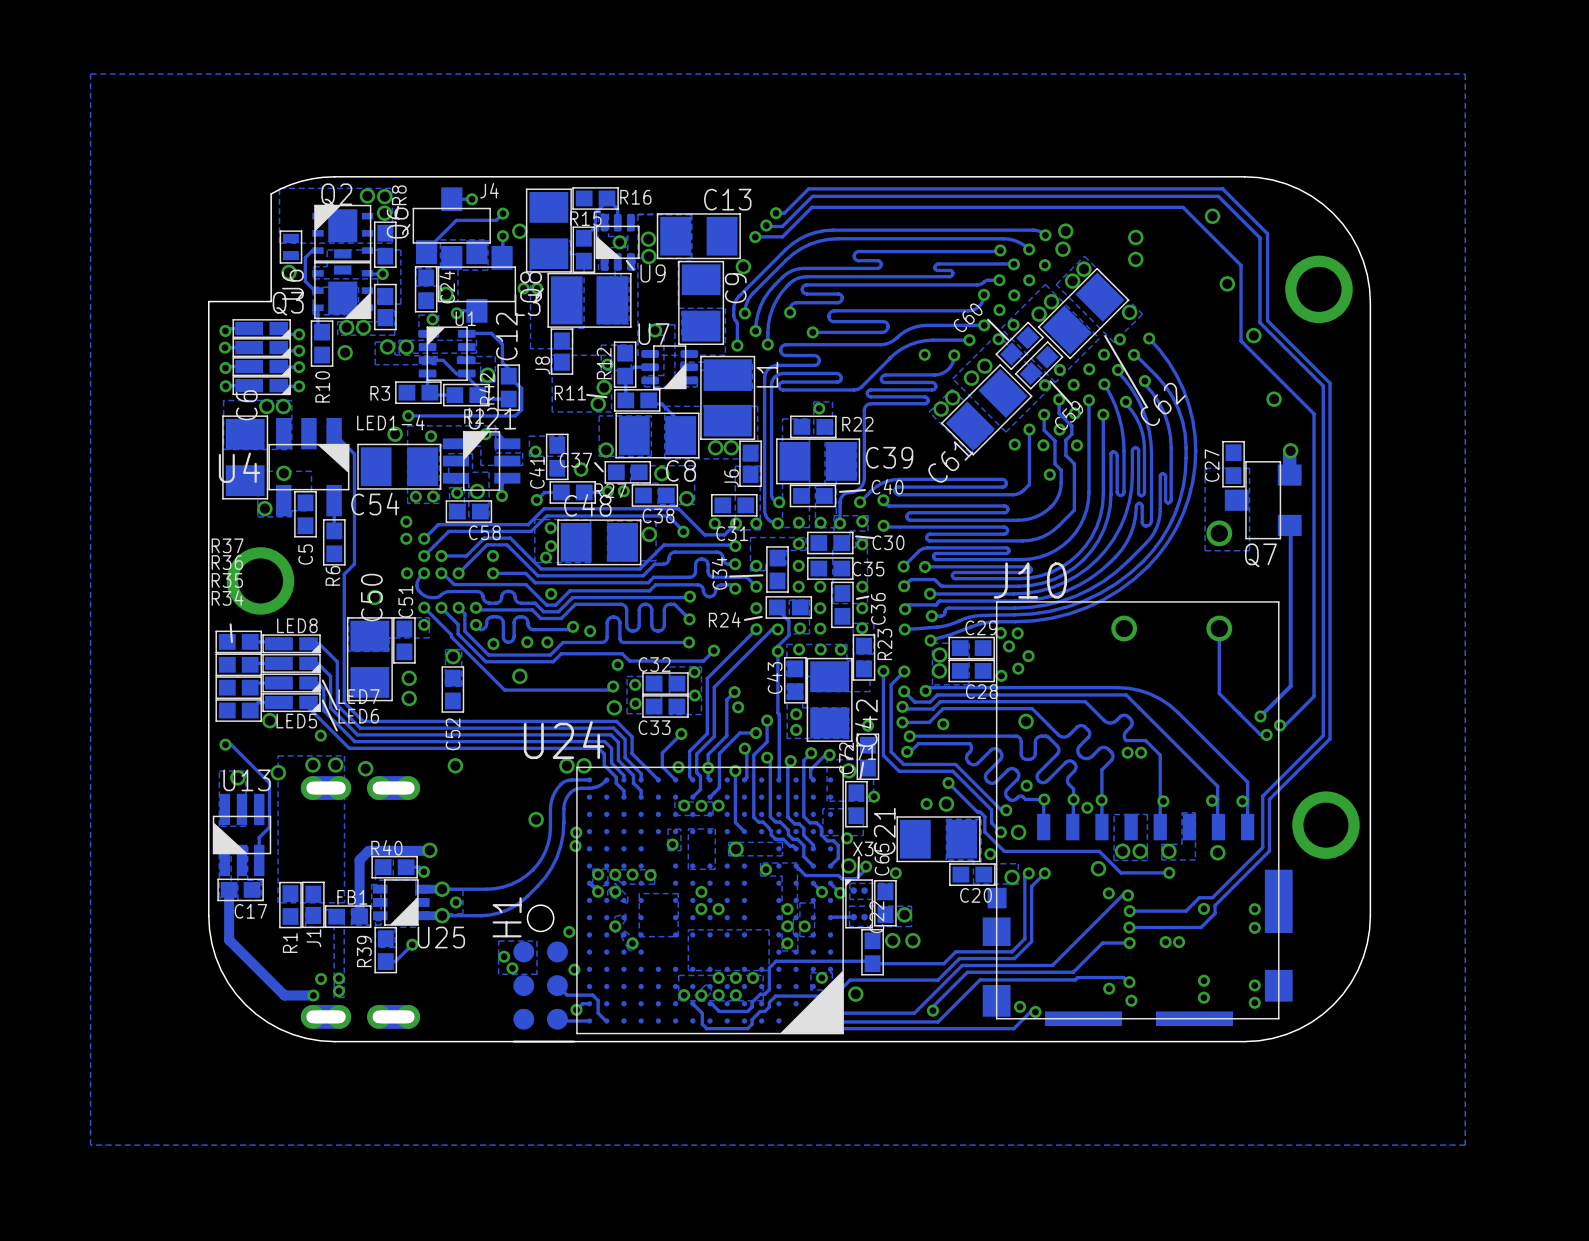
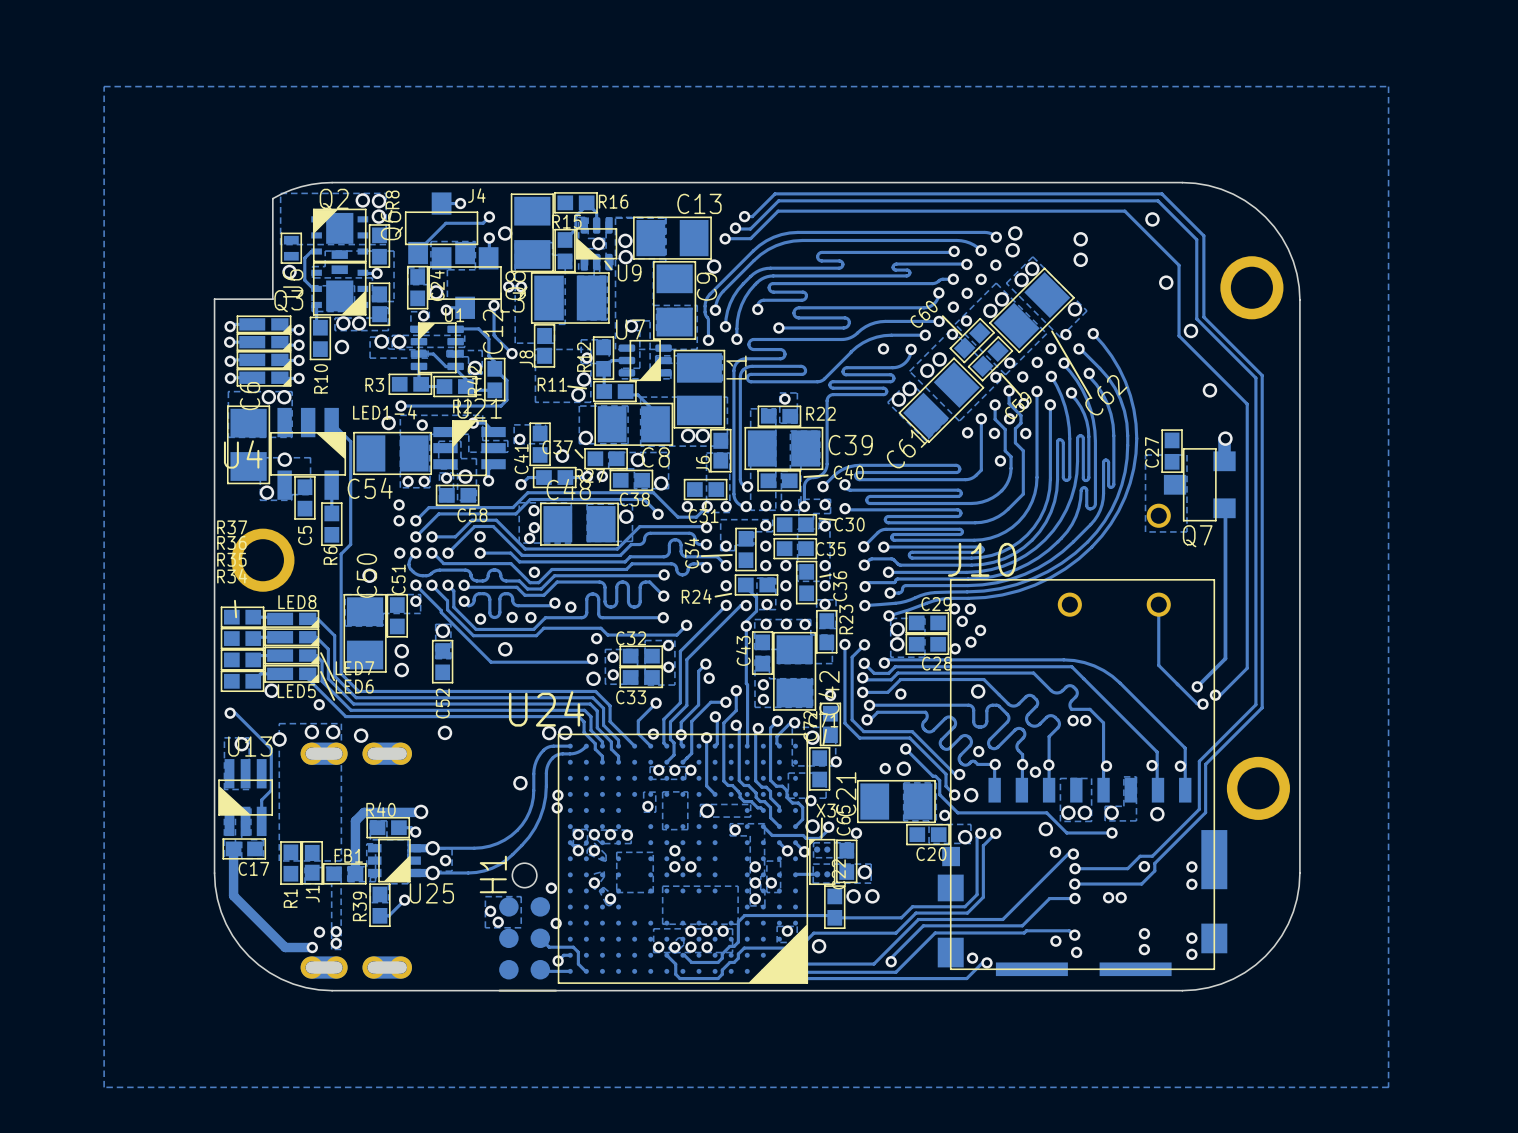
track: none -> (494, 305) (495, 336)
via: none -> (494, 305)
track: none -> (495, 336) (512, 353)
via: none -> (512, 353)

